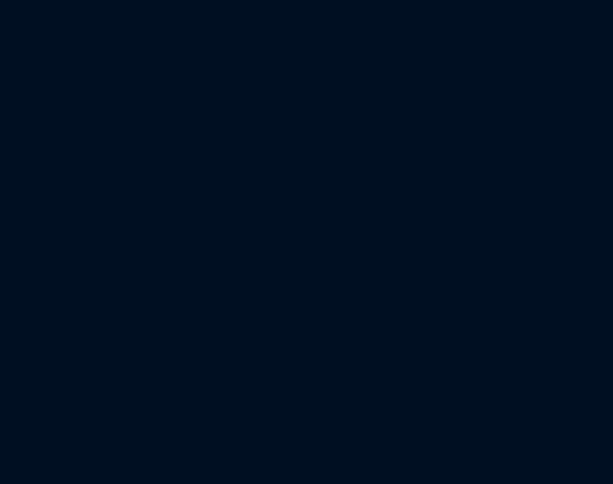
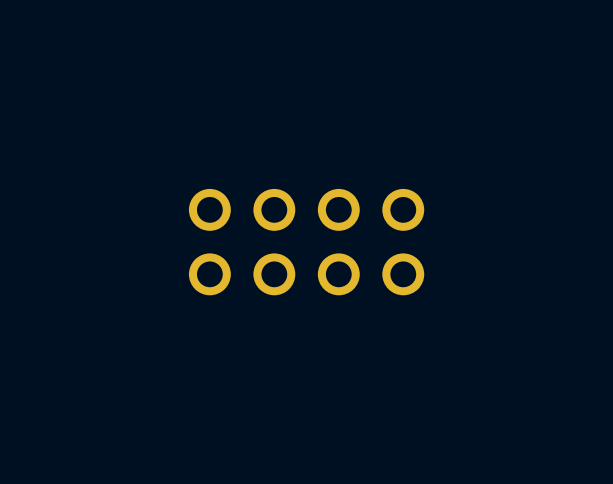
part: none -> (306, 242)

